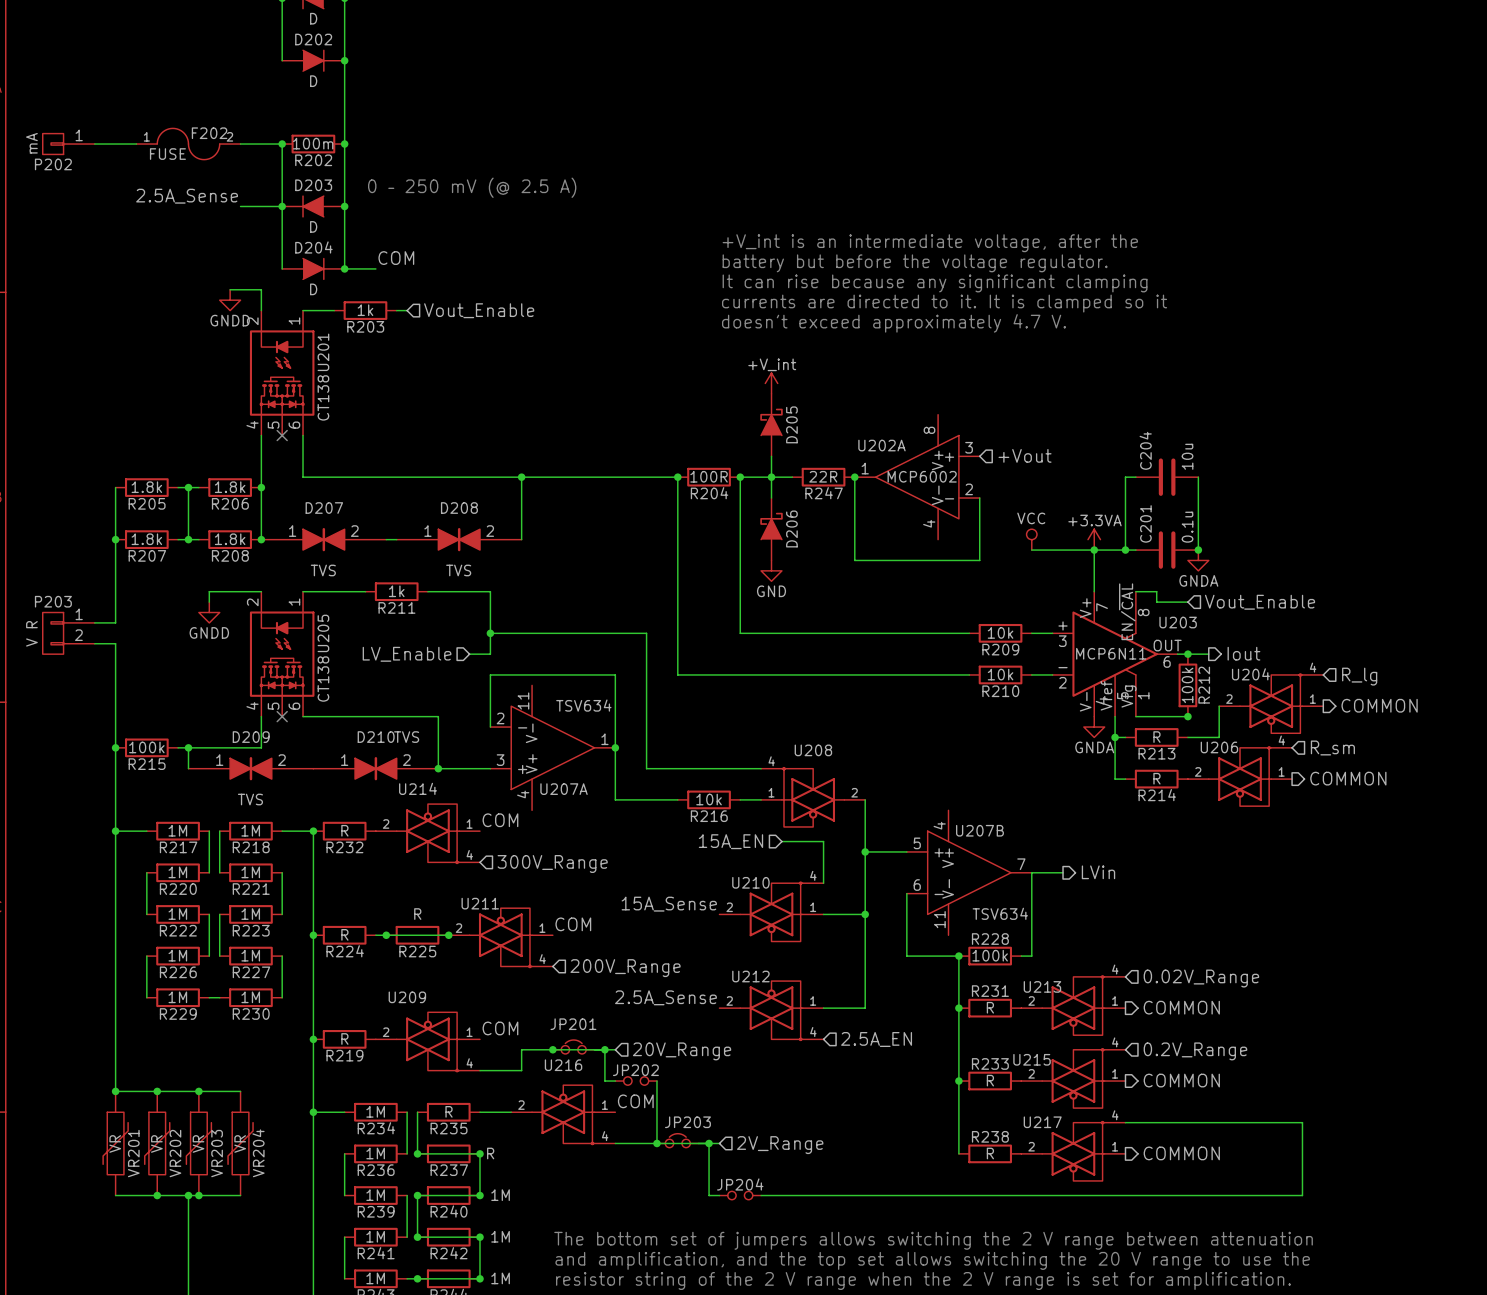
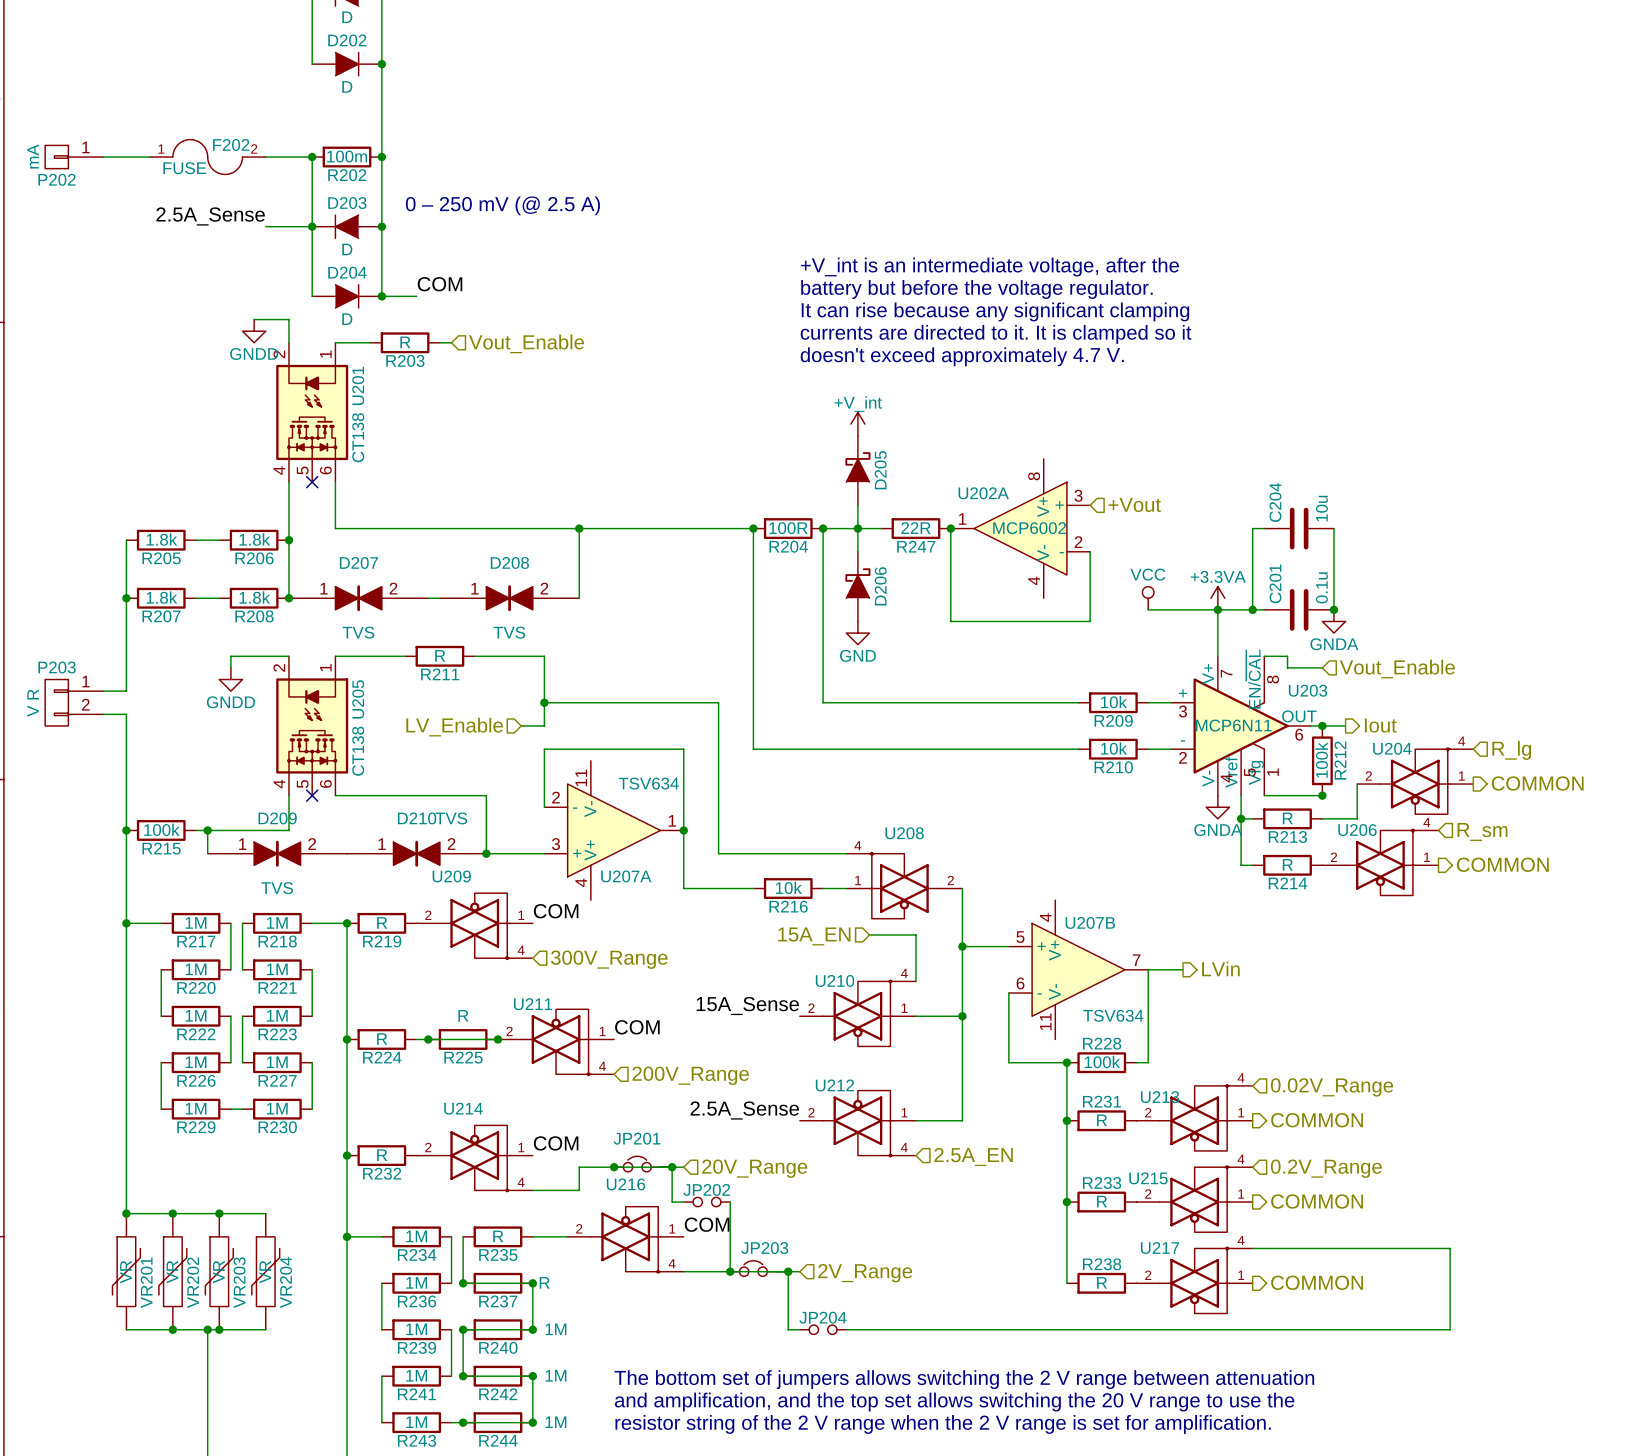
R203 value: 1k (365, 310) -> R (405, 342)
wire: (188, 487) (188, 539) -> none
junction: (188, 487) -> none
junction: (188, 539) -> none
R211 value: 1k (396, 591) -> R (440, 655)
U214 name: U214 (418, 788) -> U209 (451, 876)
R232 name: R232 (344, 847) -> R219 (382, 941)
U209 name: U209 (407, 997) -> U214 (463, 1108)
R219 name: R219 (344, 1055) -> R232 (382, 1173)

